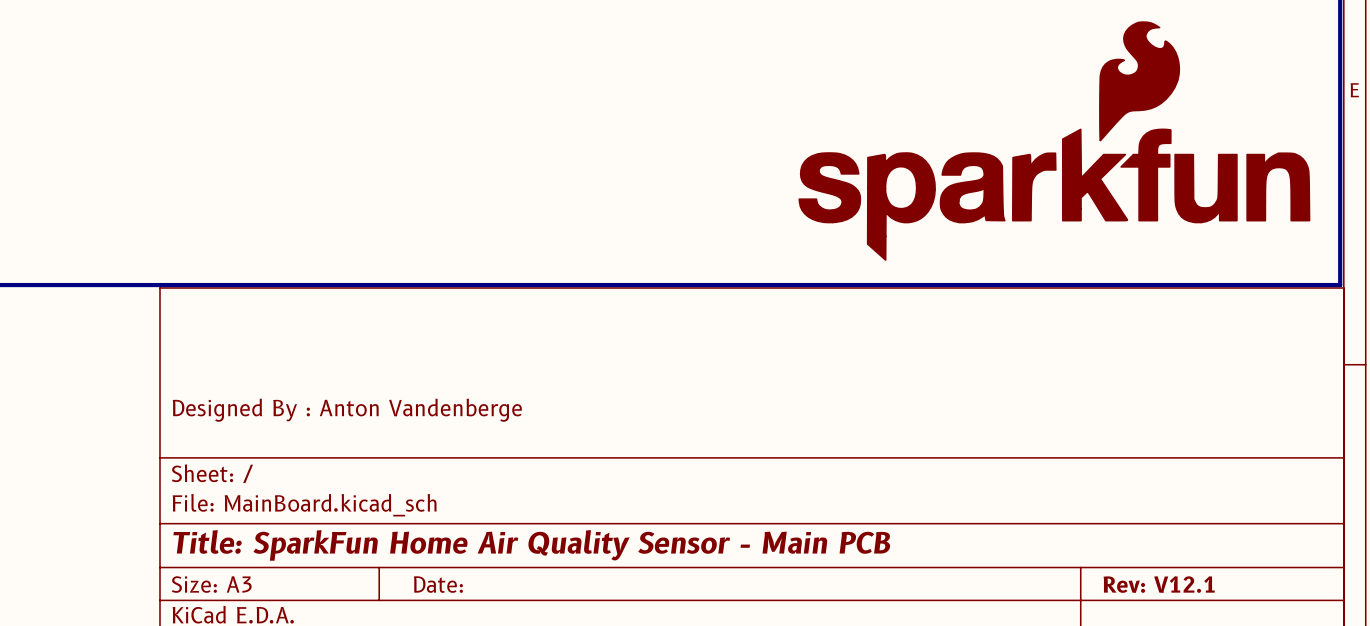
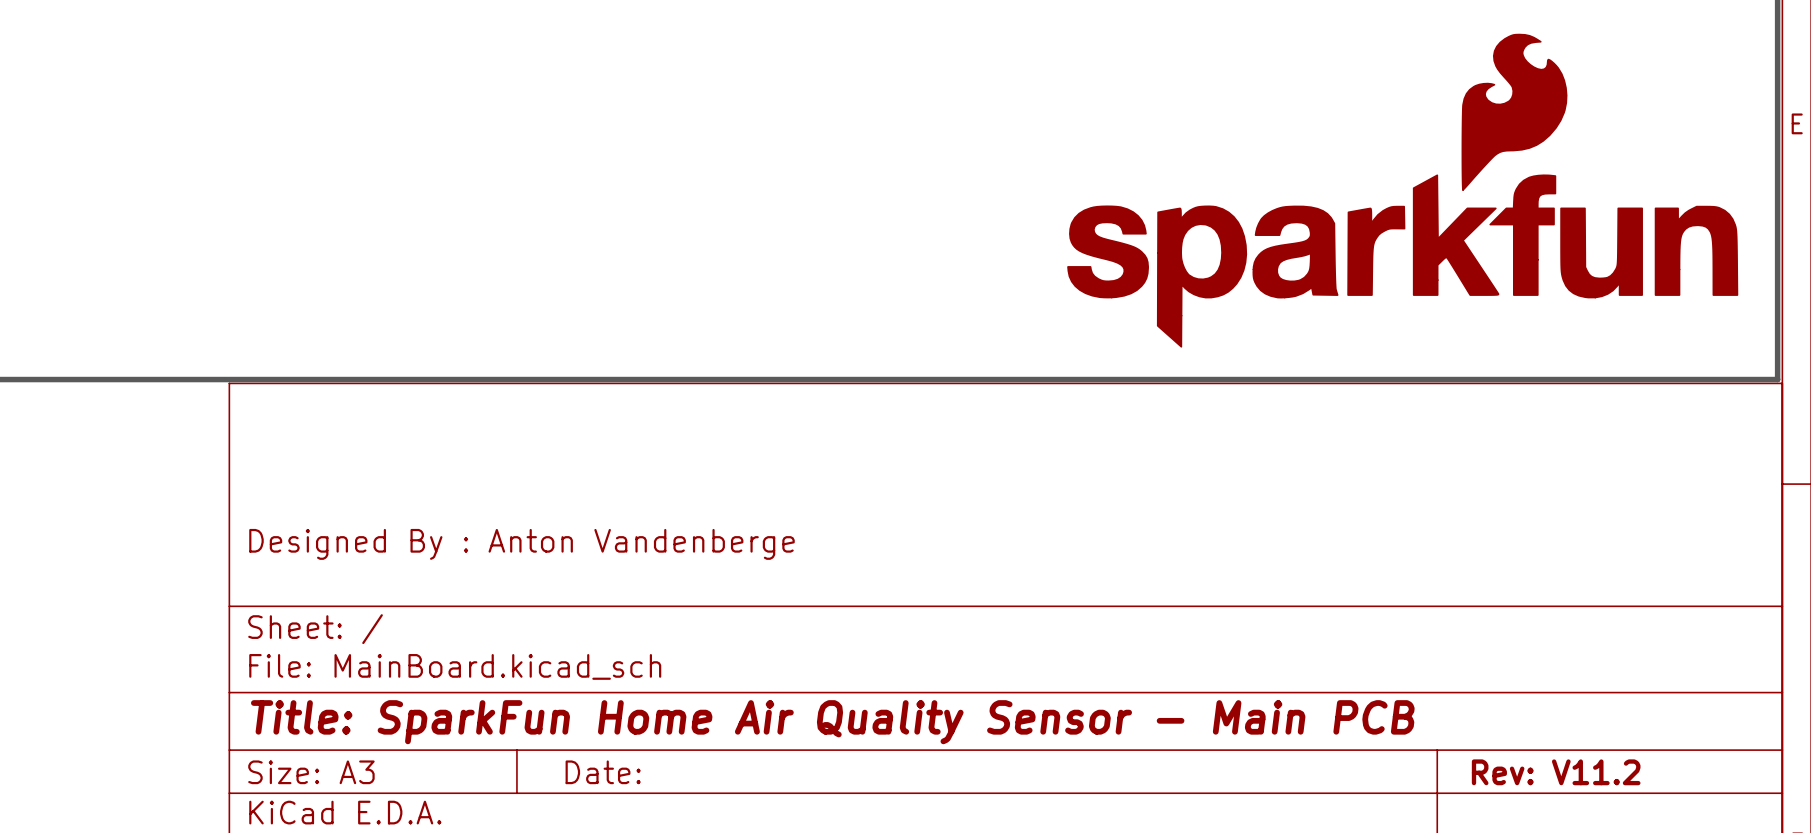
title block: Rev: V12.1 (1159, 584) -> Rev: V11.2 (1556, 772)

